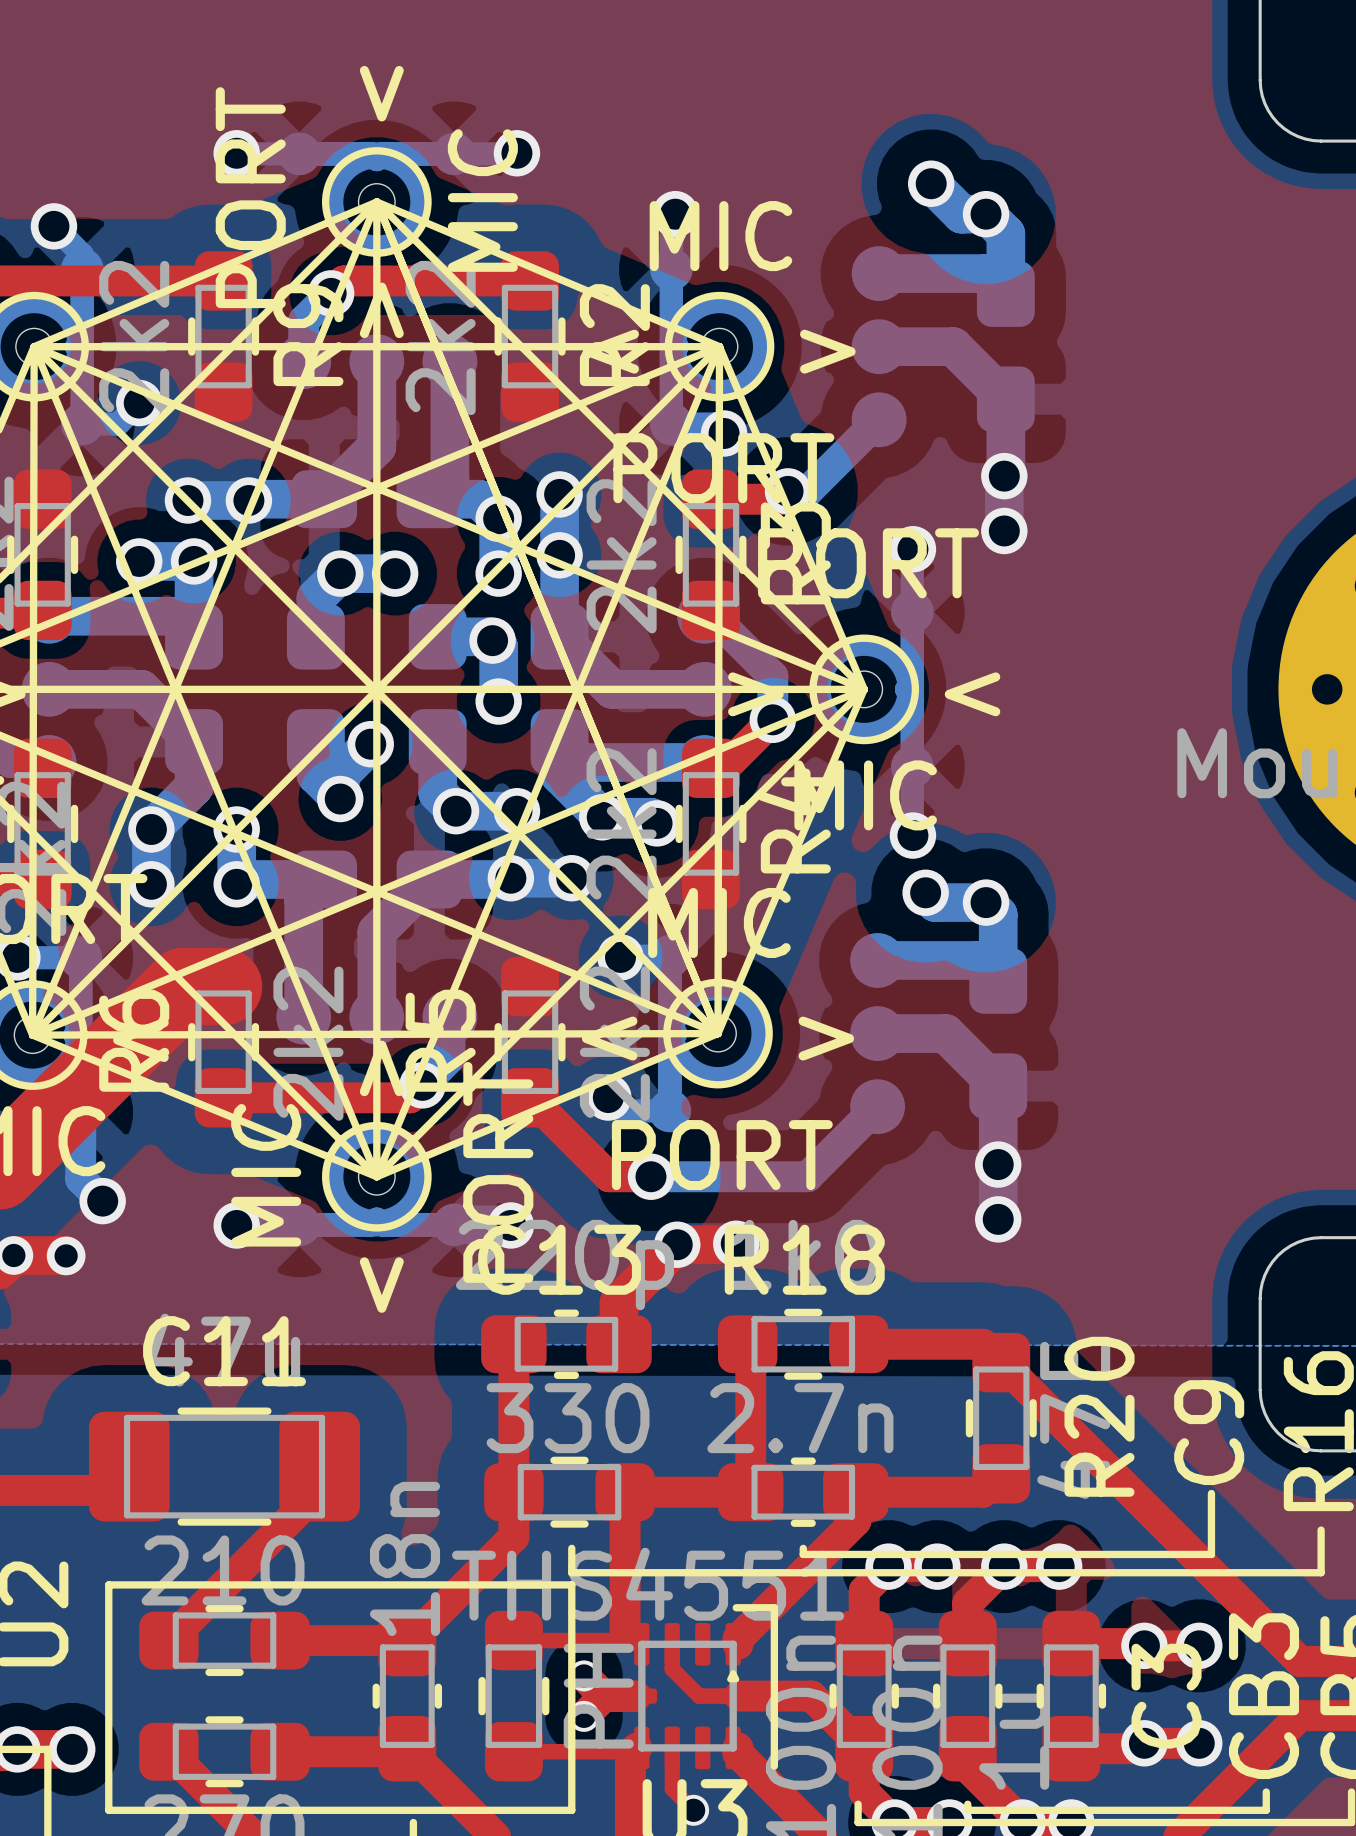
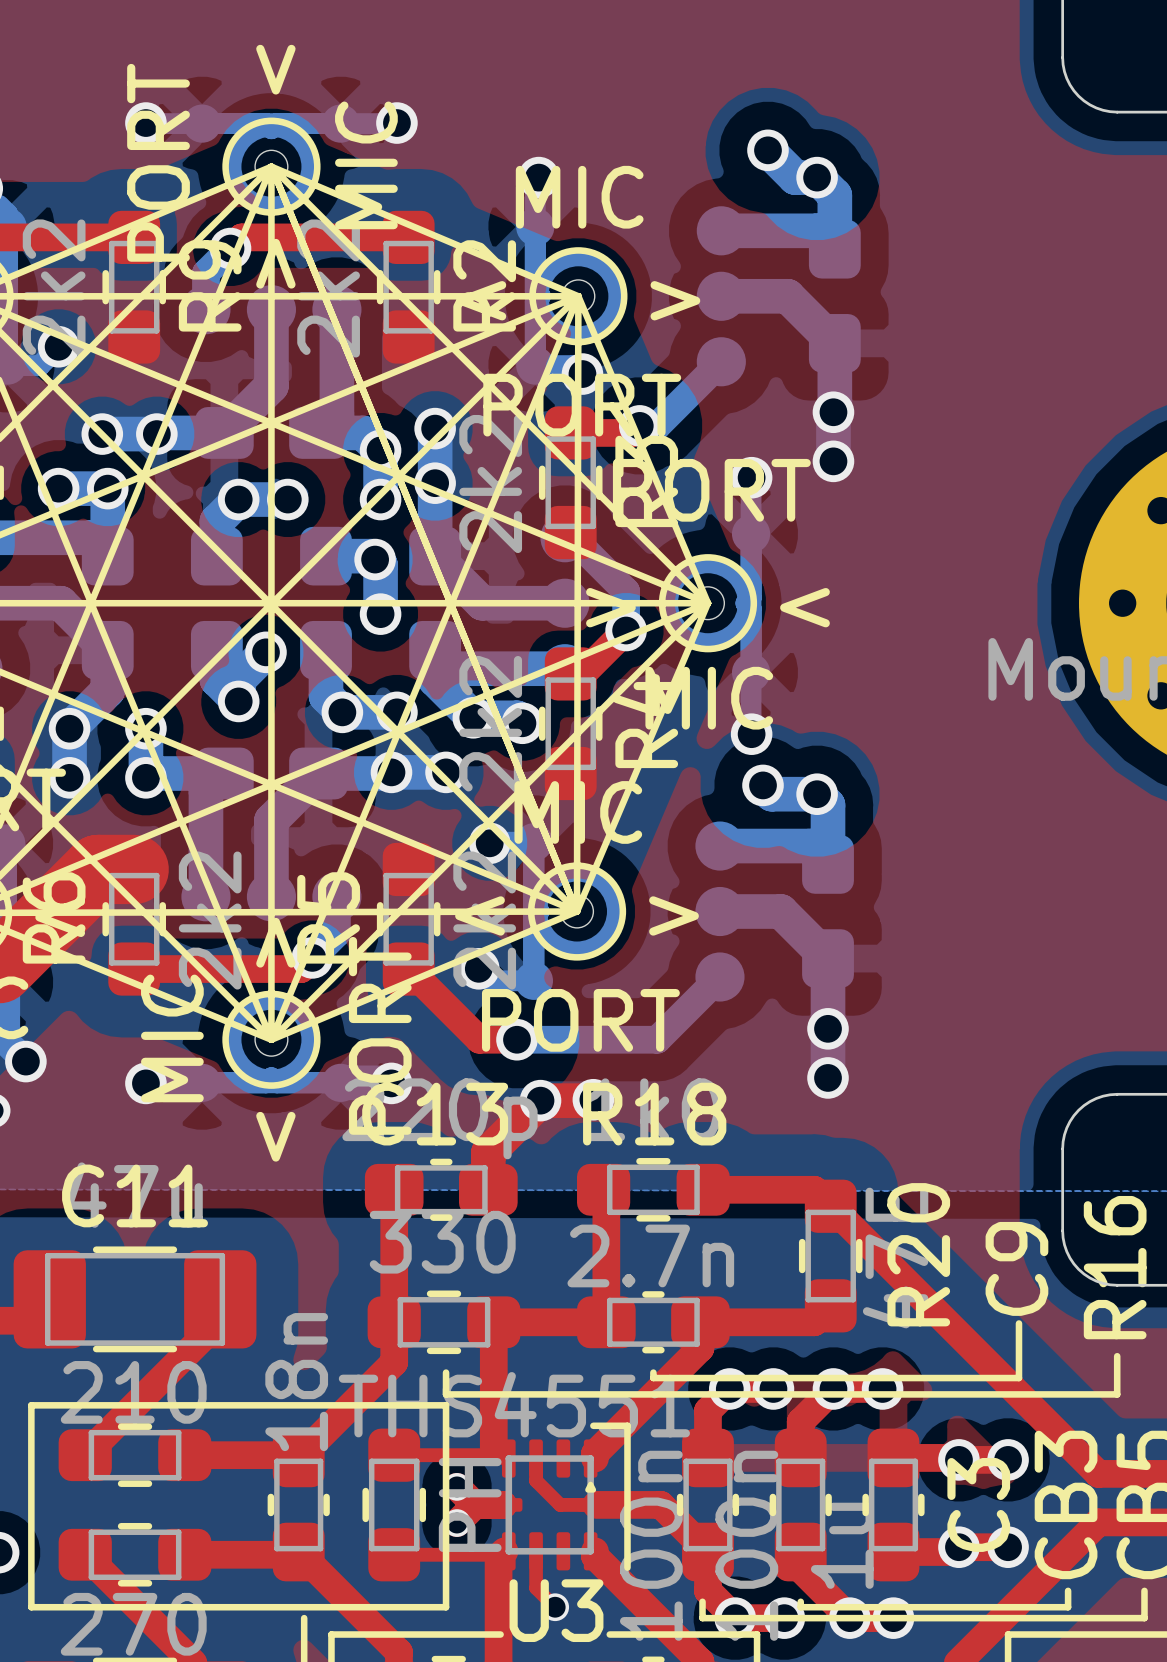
R16 value position: 330 (568, 1418) -> 330 (442, 1242)

